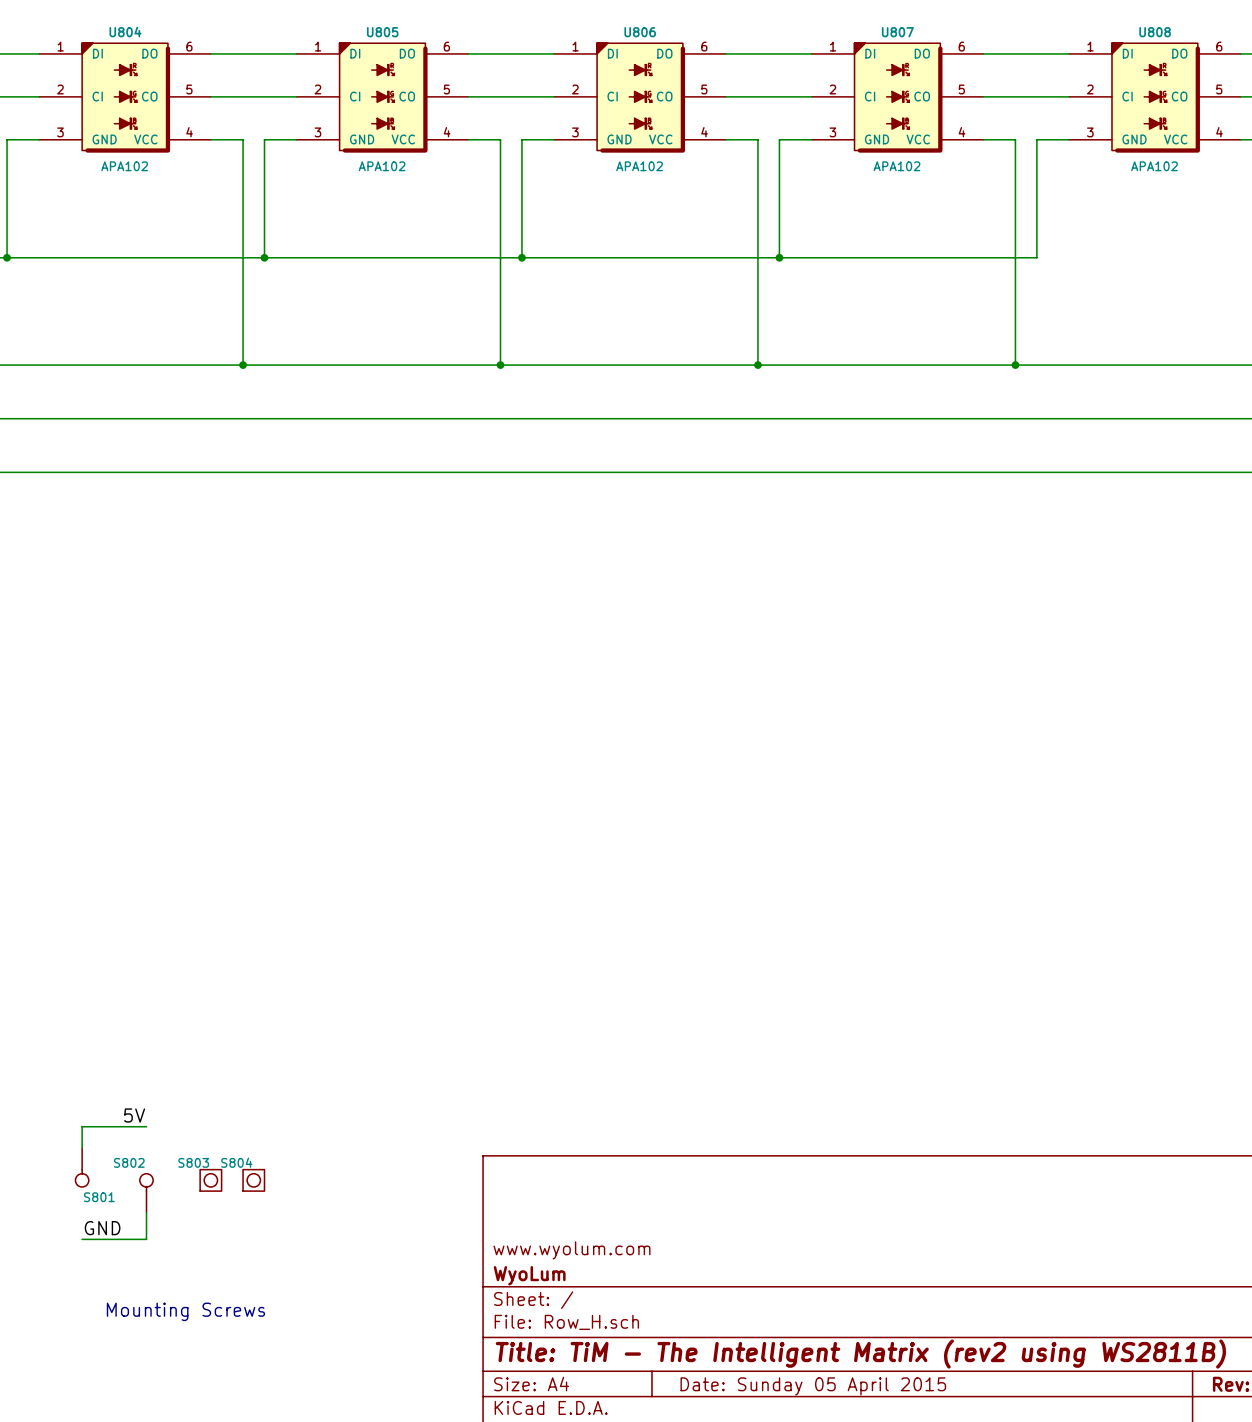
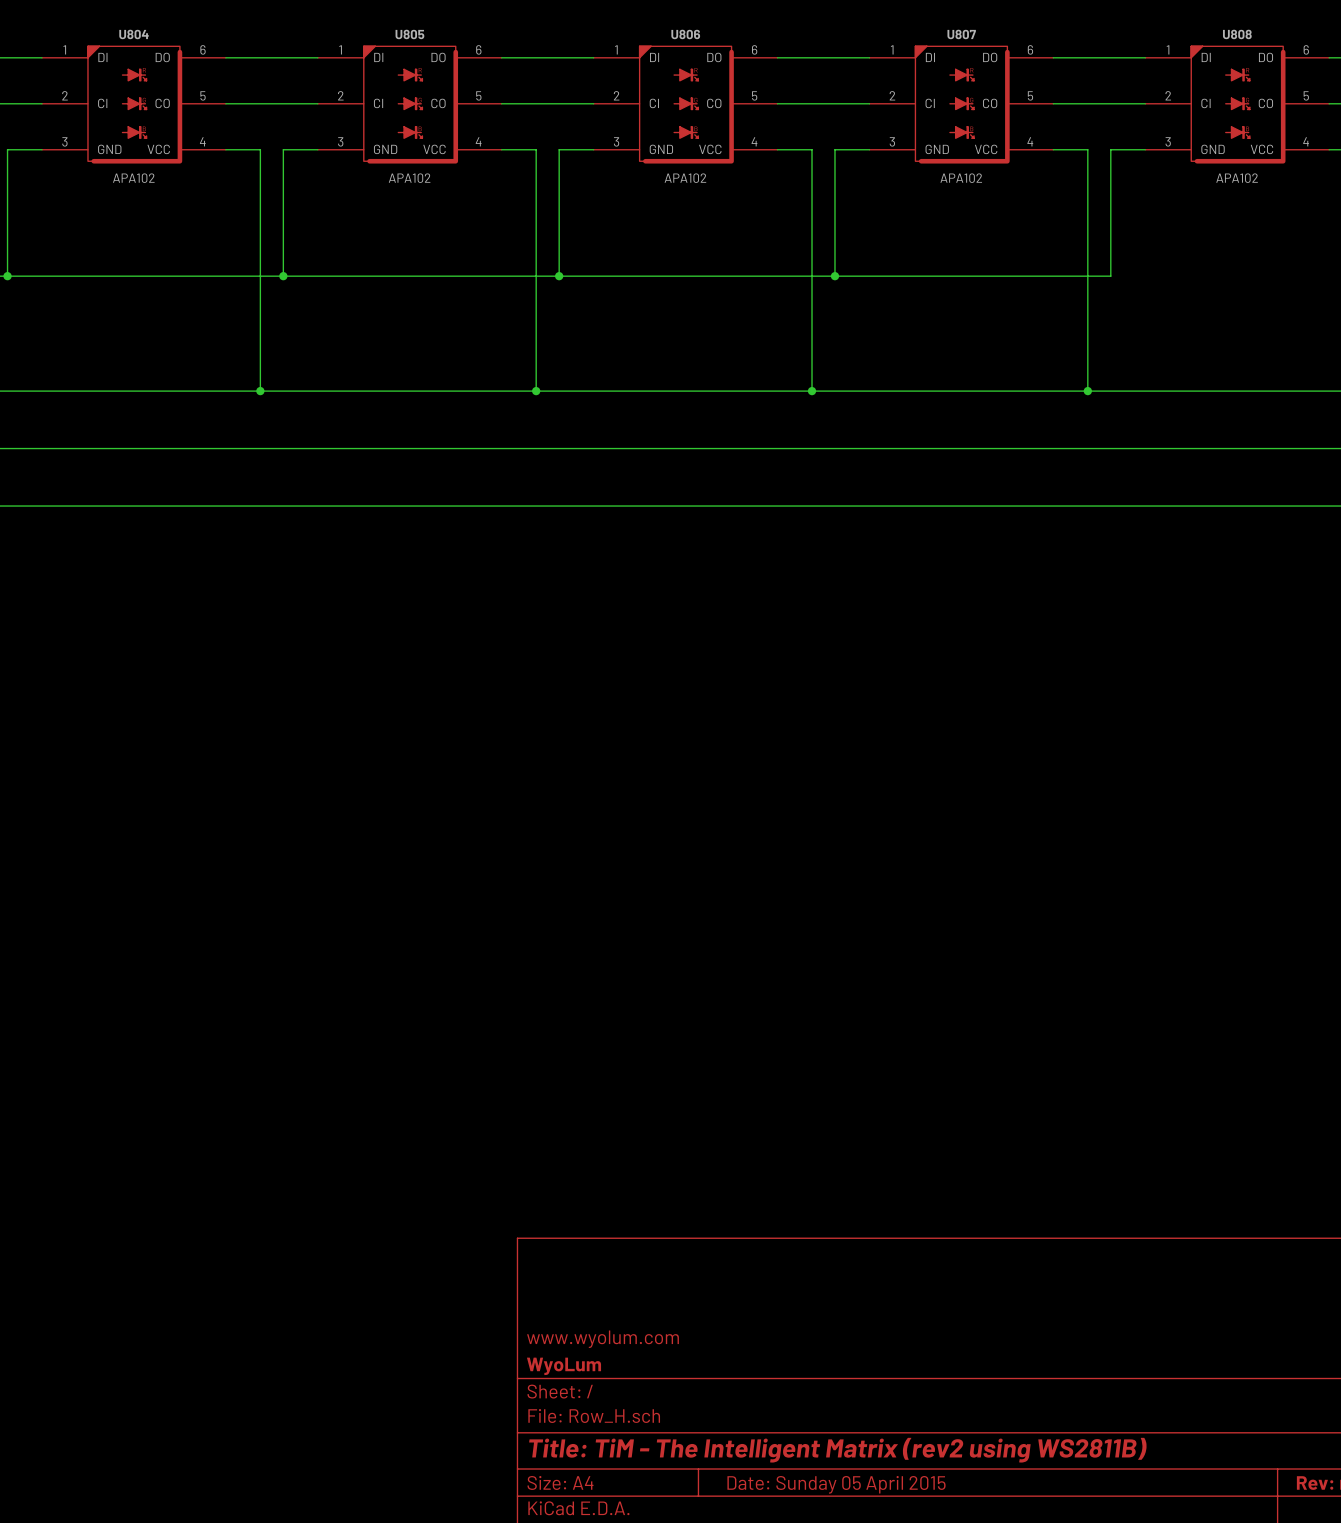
label: 5V (134, 1115) -> none
wire: (146, 1126) (82, 1126) (82, 1148) -> none
S801: (82, 1167) -> none
S803: (210, 1180) -> none
S804: (253, 1180) -> none
S802: (146, 1193) -> none
wire: (146, 1212) (146, 1239) (82, 1239) -> none
label: GND (102, 1228) -> none
text: Mounting Screws (185, 1311) -> none

